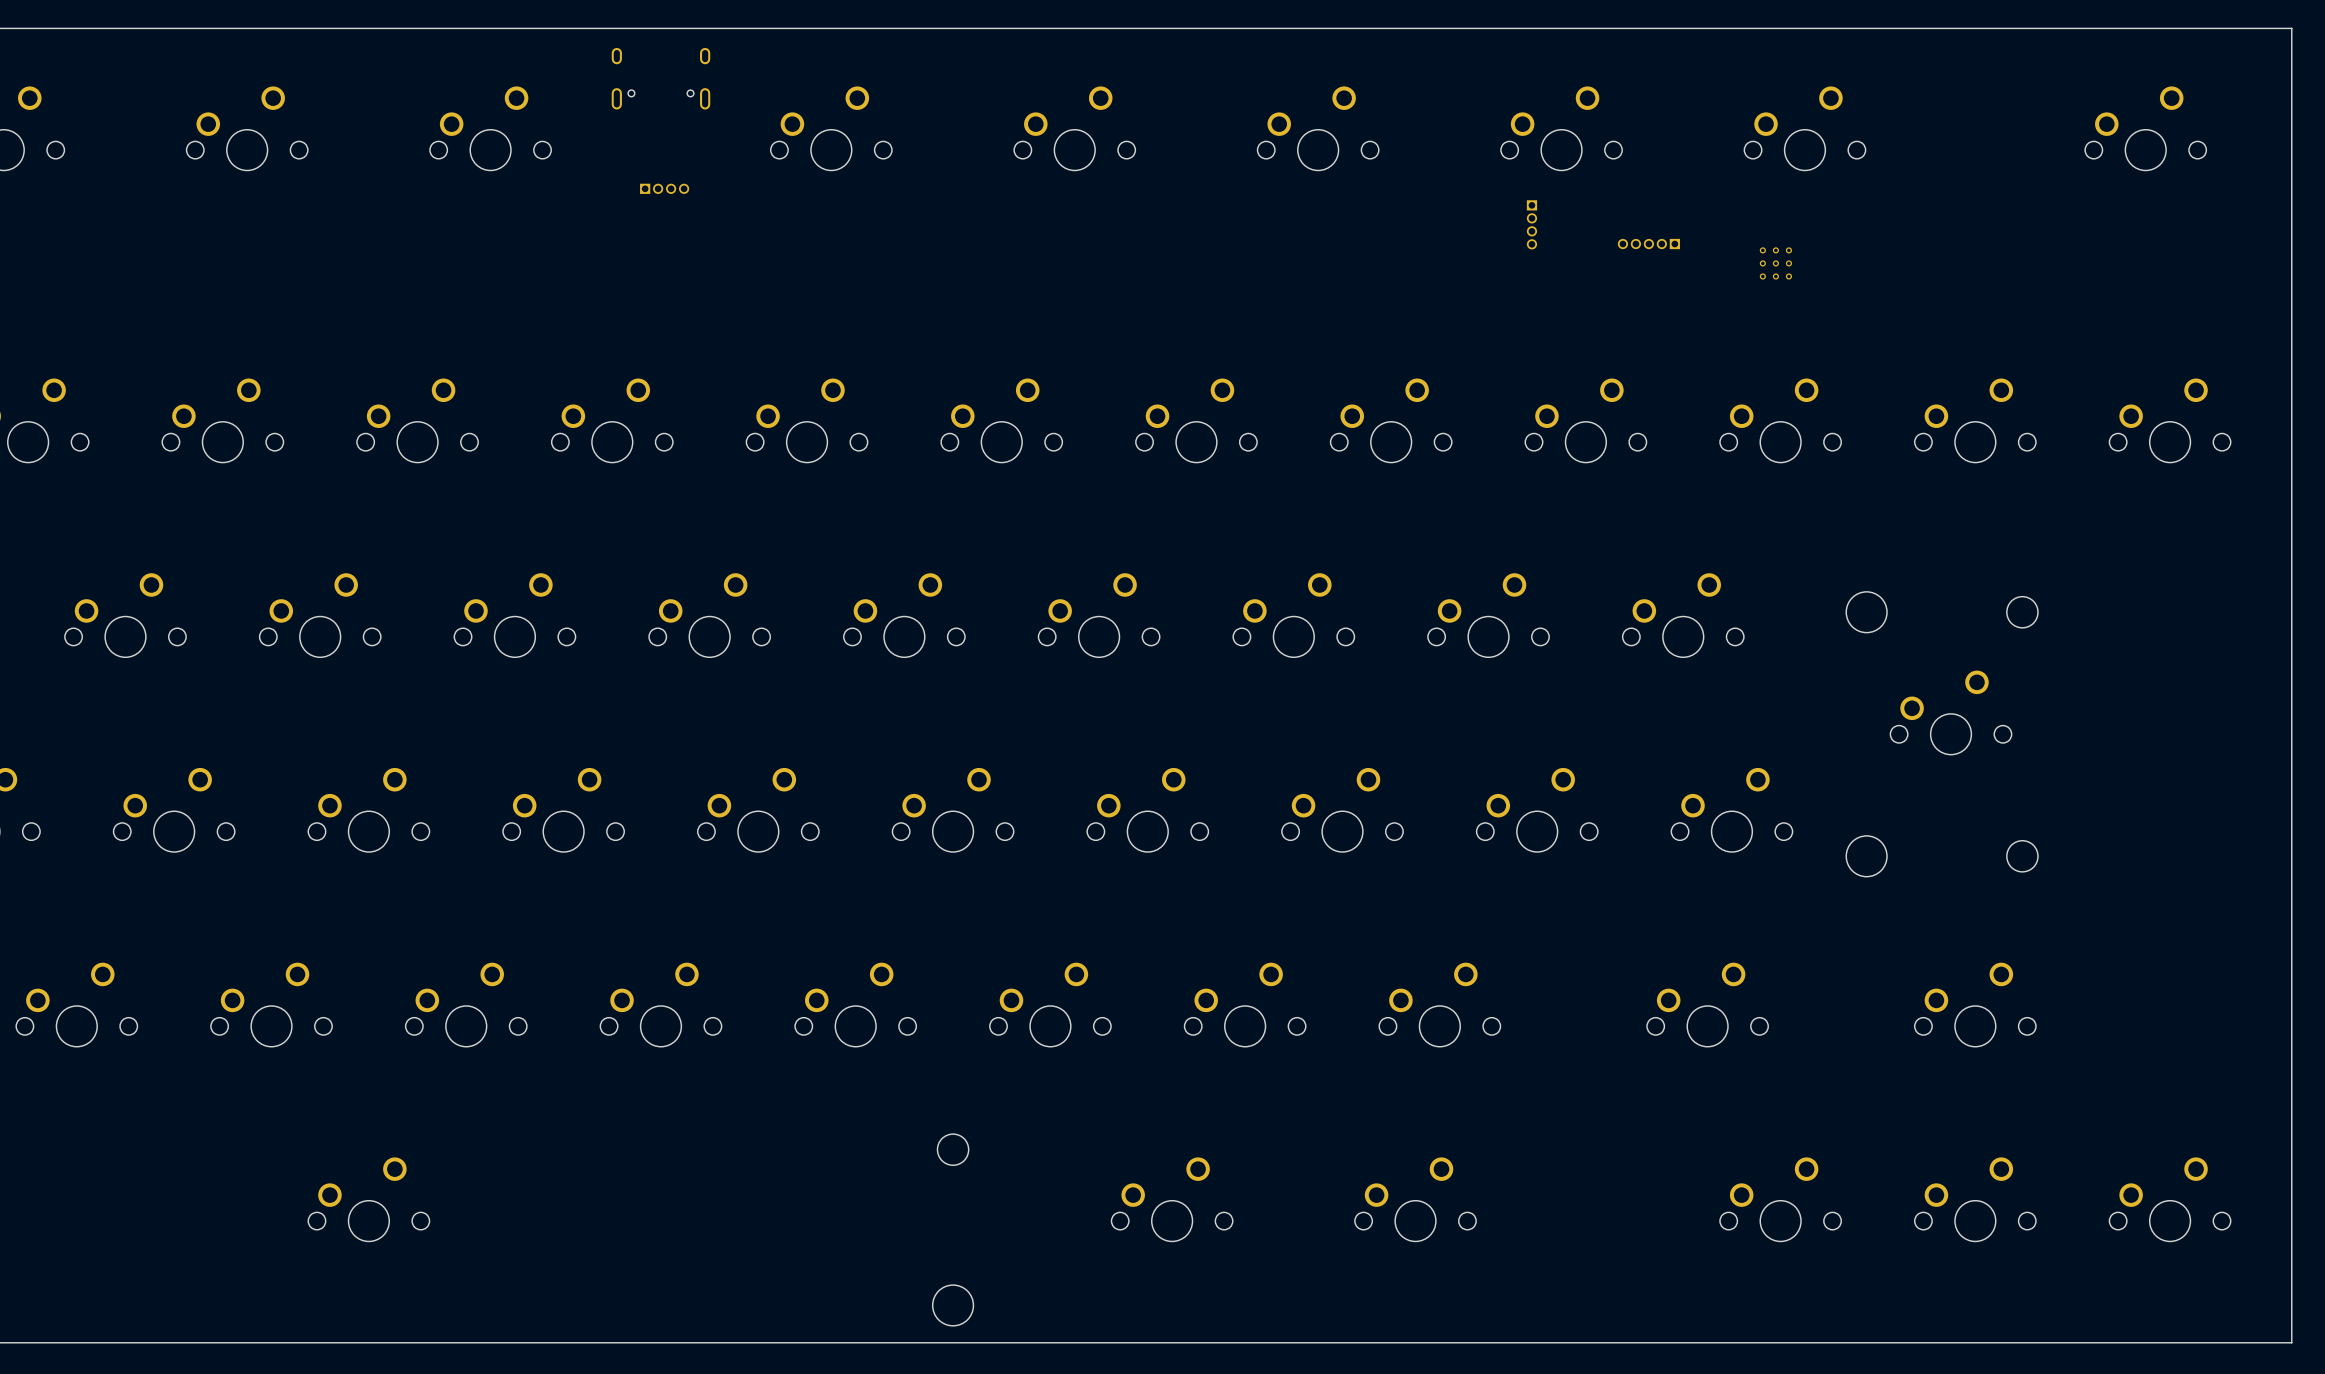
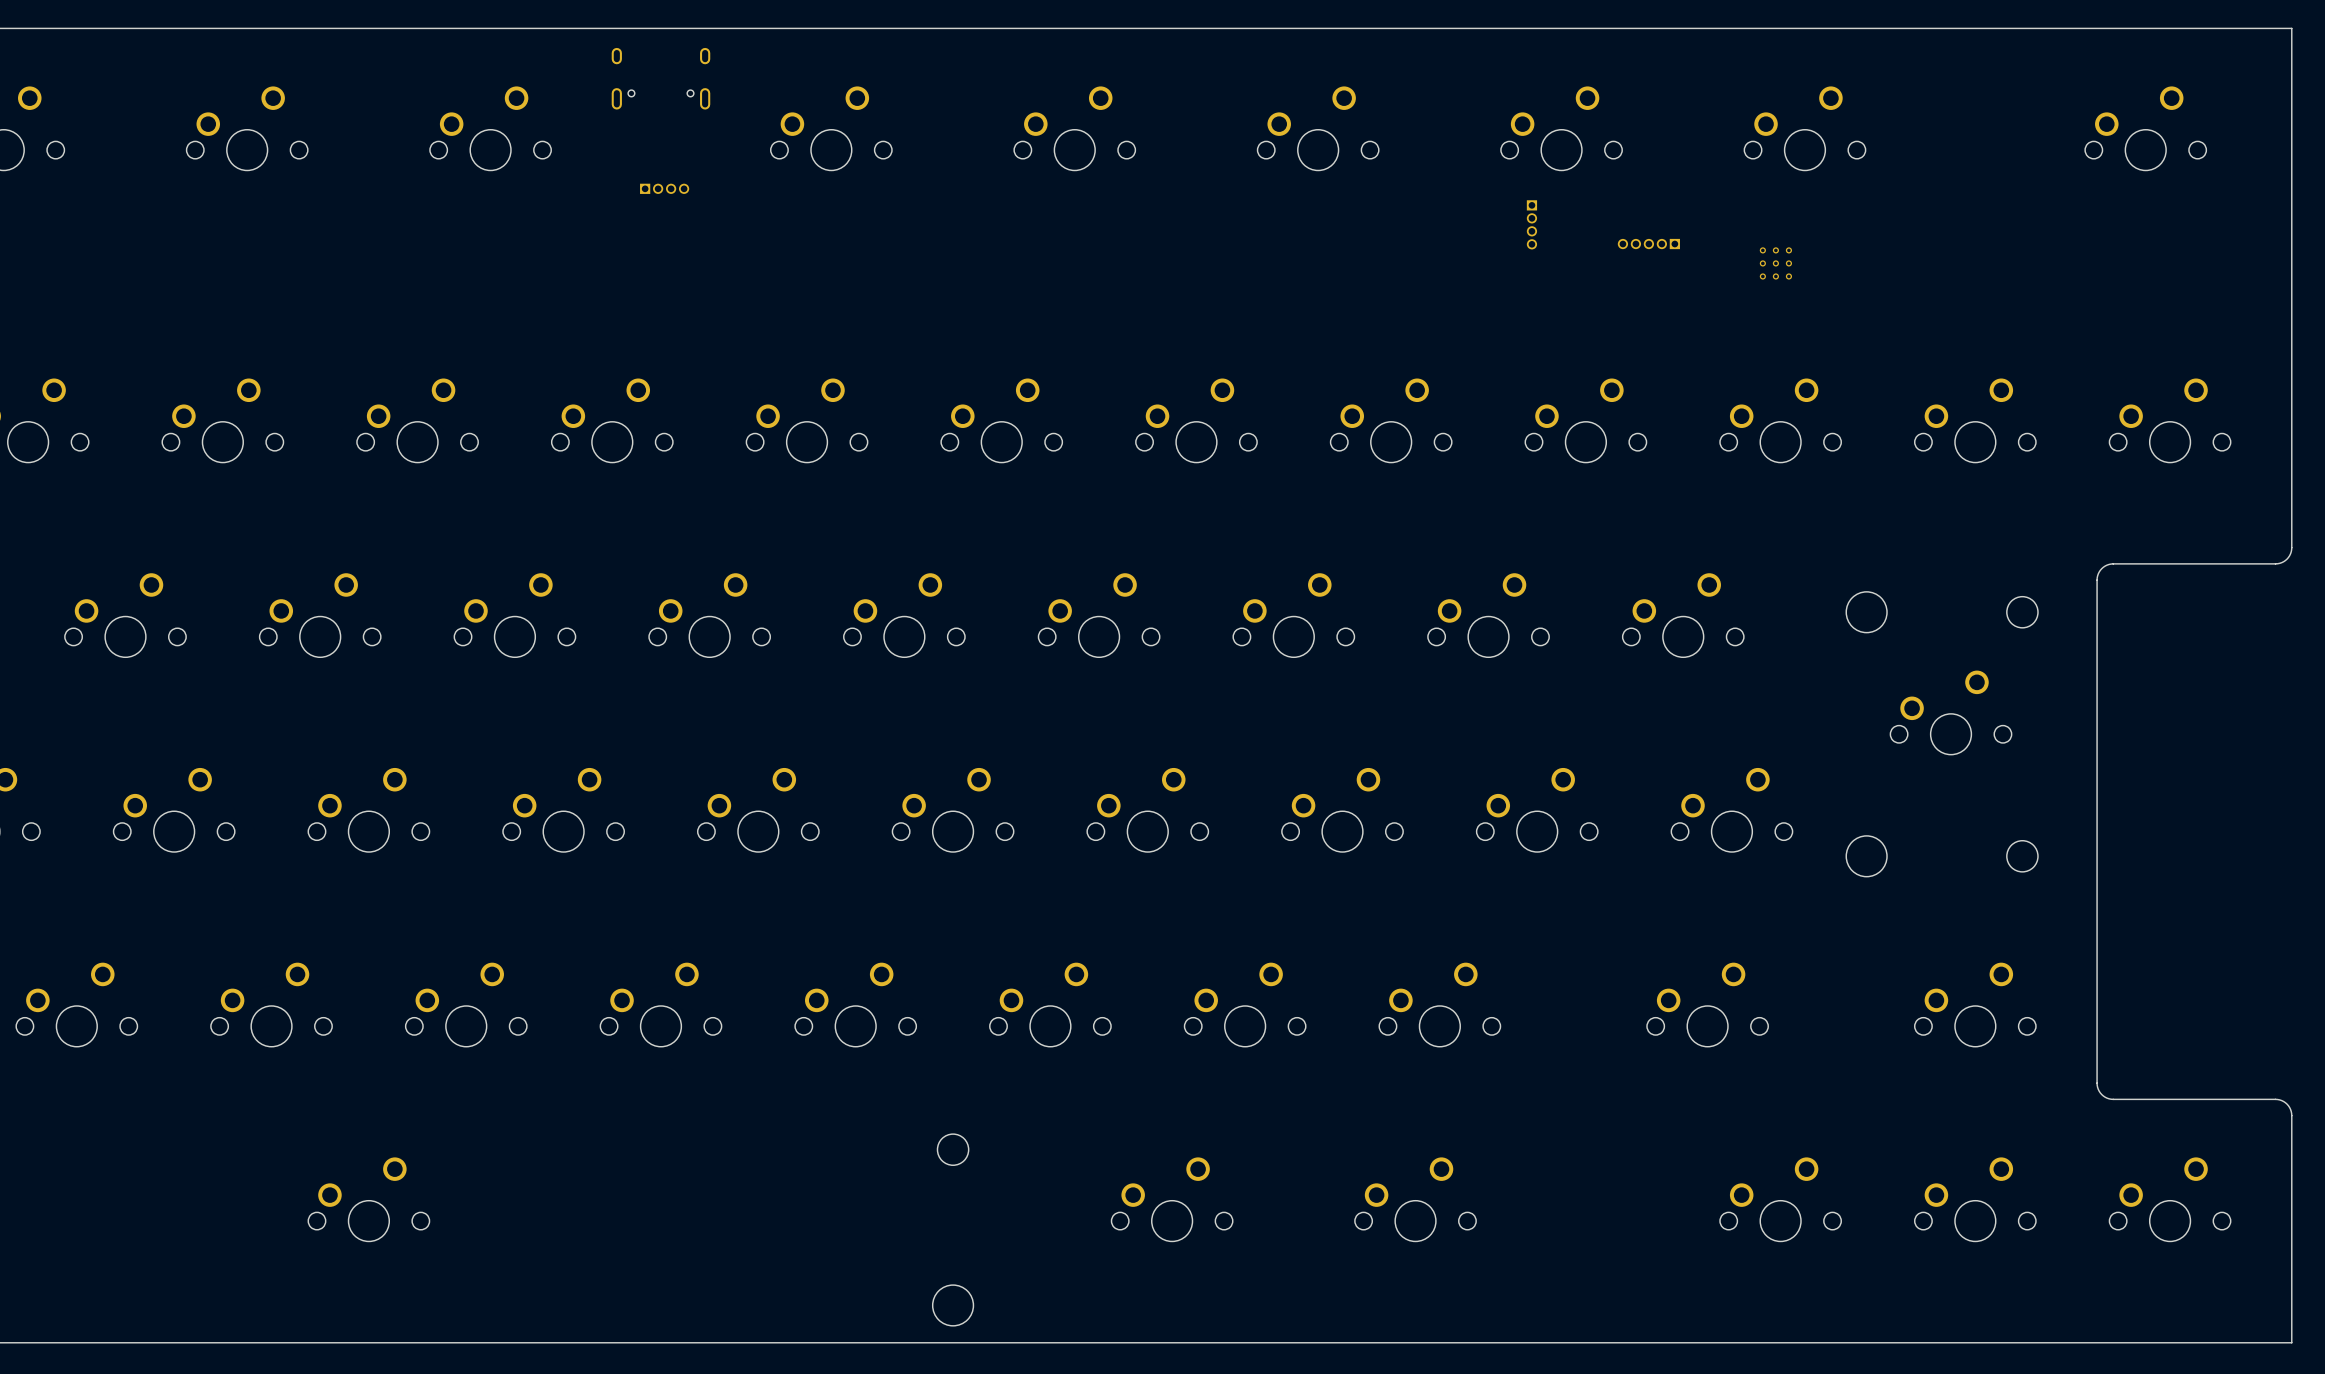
board edge: (2291, 547) (2291, 1115) -> (2291, 547) (2288, 557) (2277, 563) (2111, 564) (2101, 568) (2097, 580) (2098, 1089) (2103, 1096) (2113, 1099) (2277, 1099) (2288, 1105) (2291, 1115)

